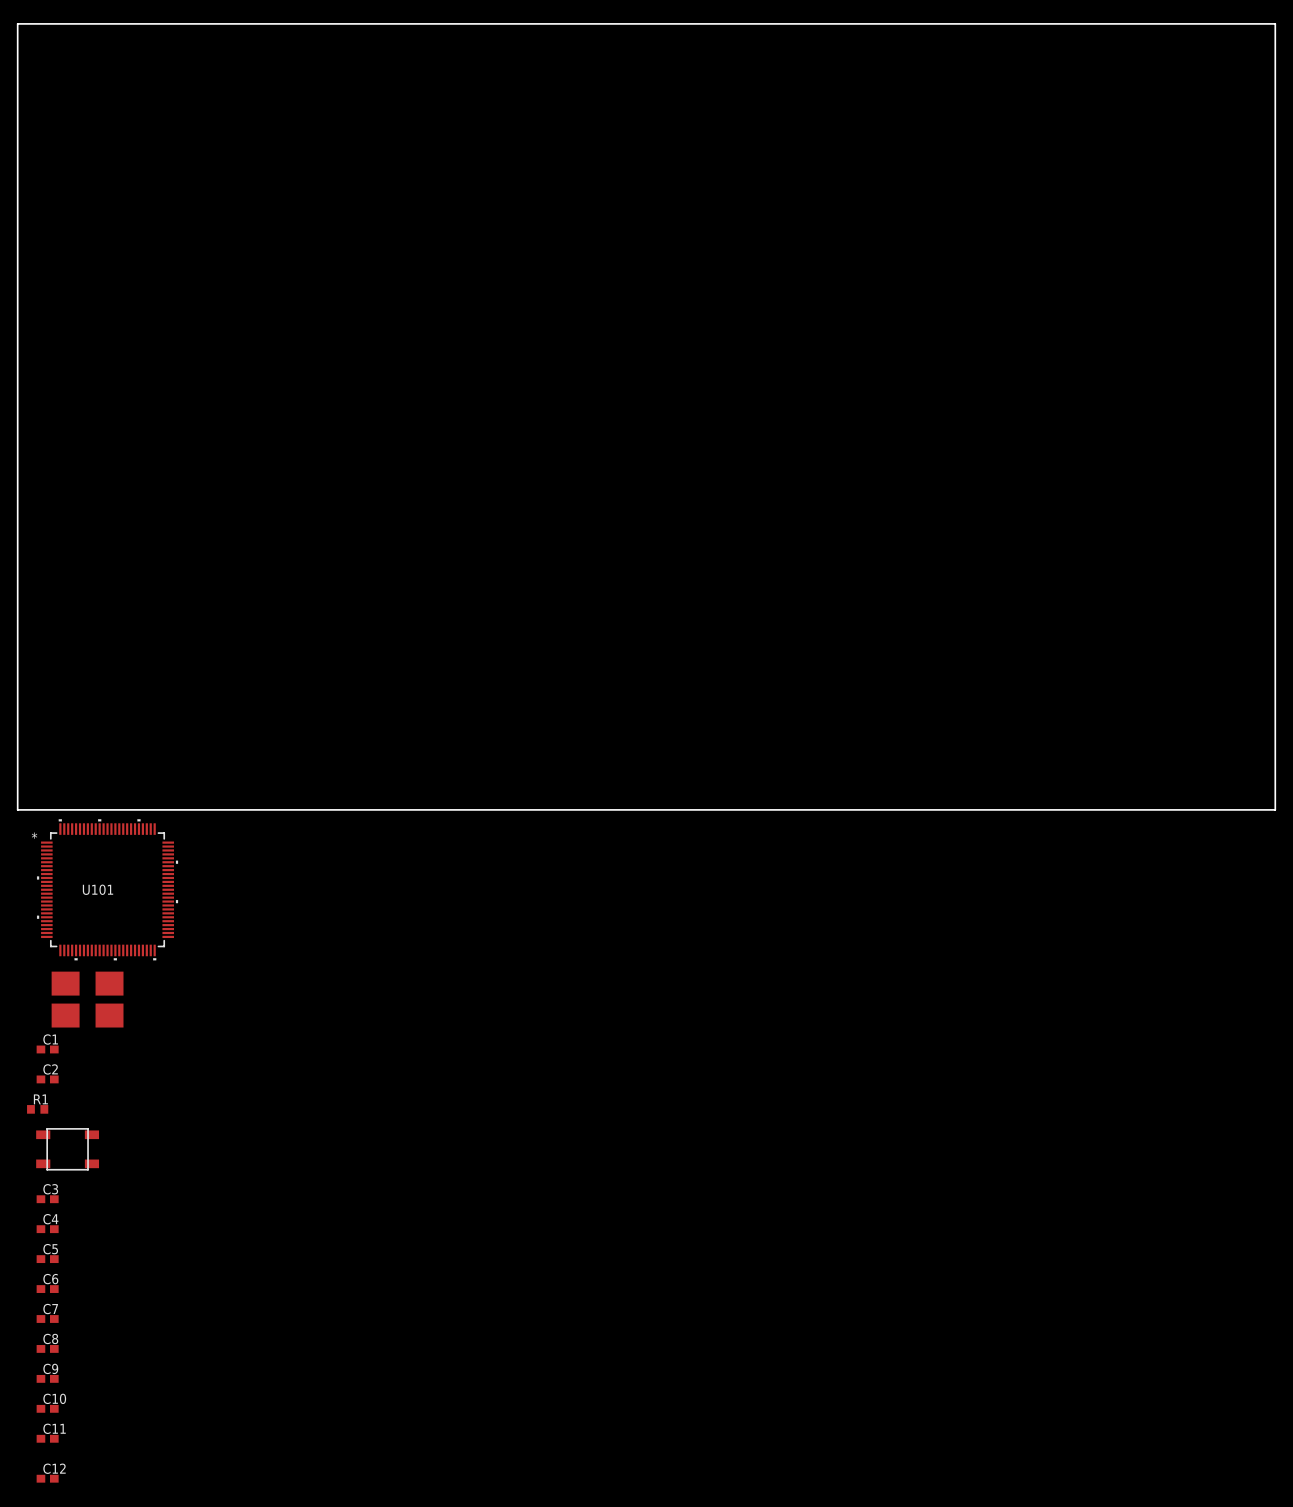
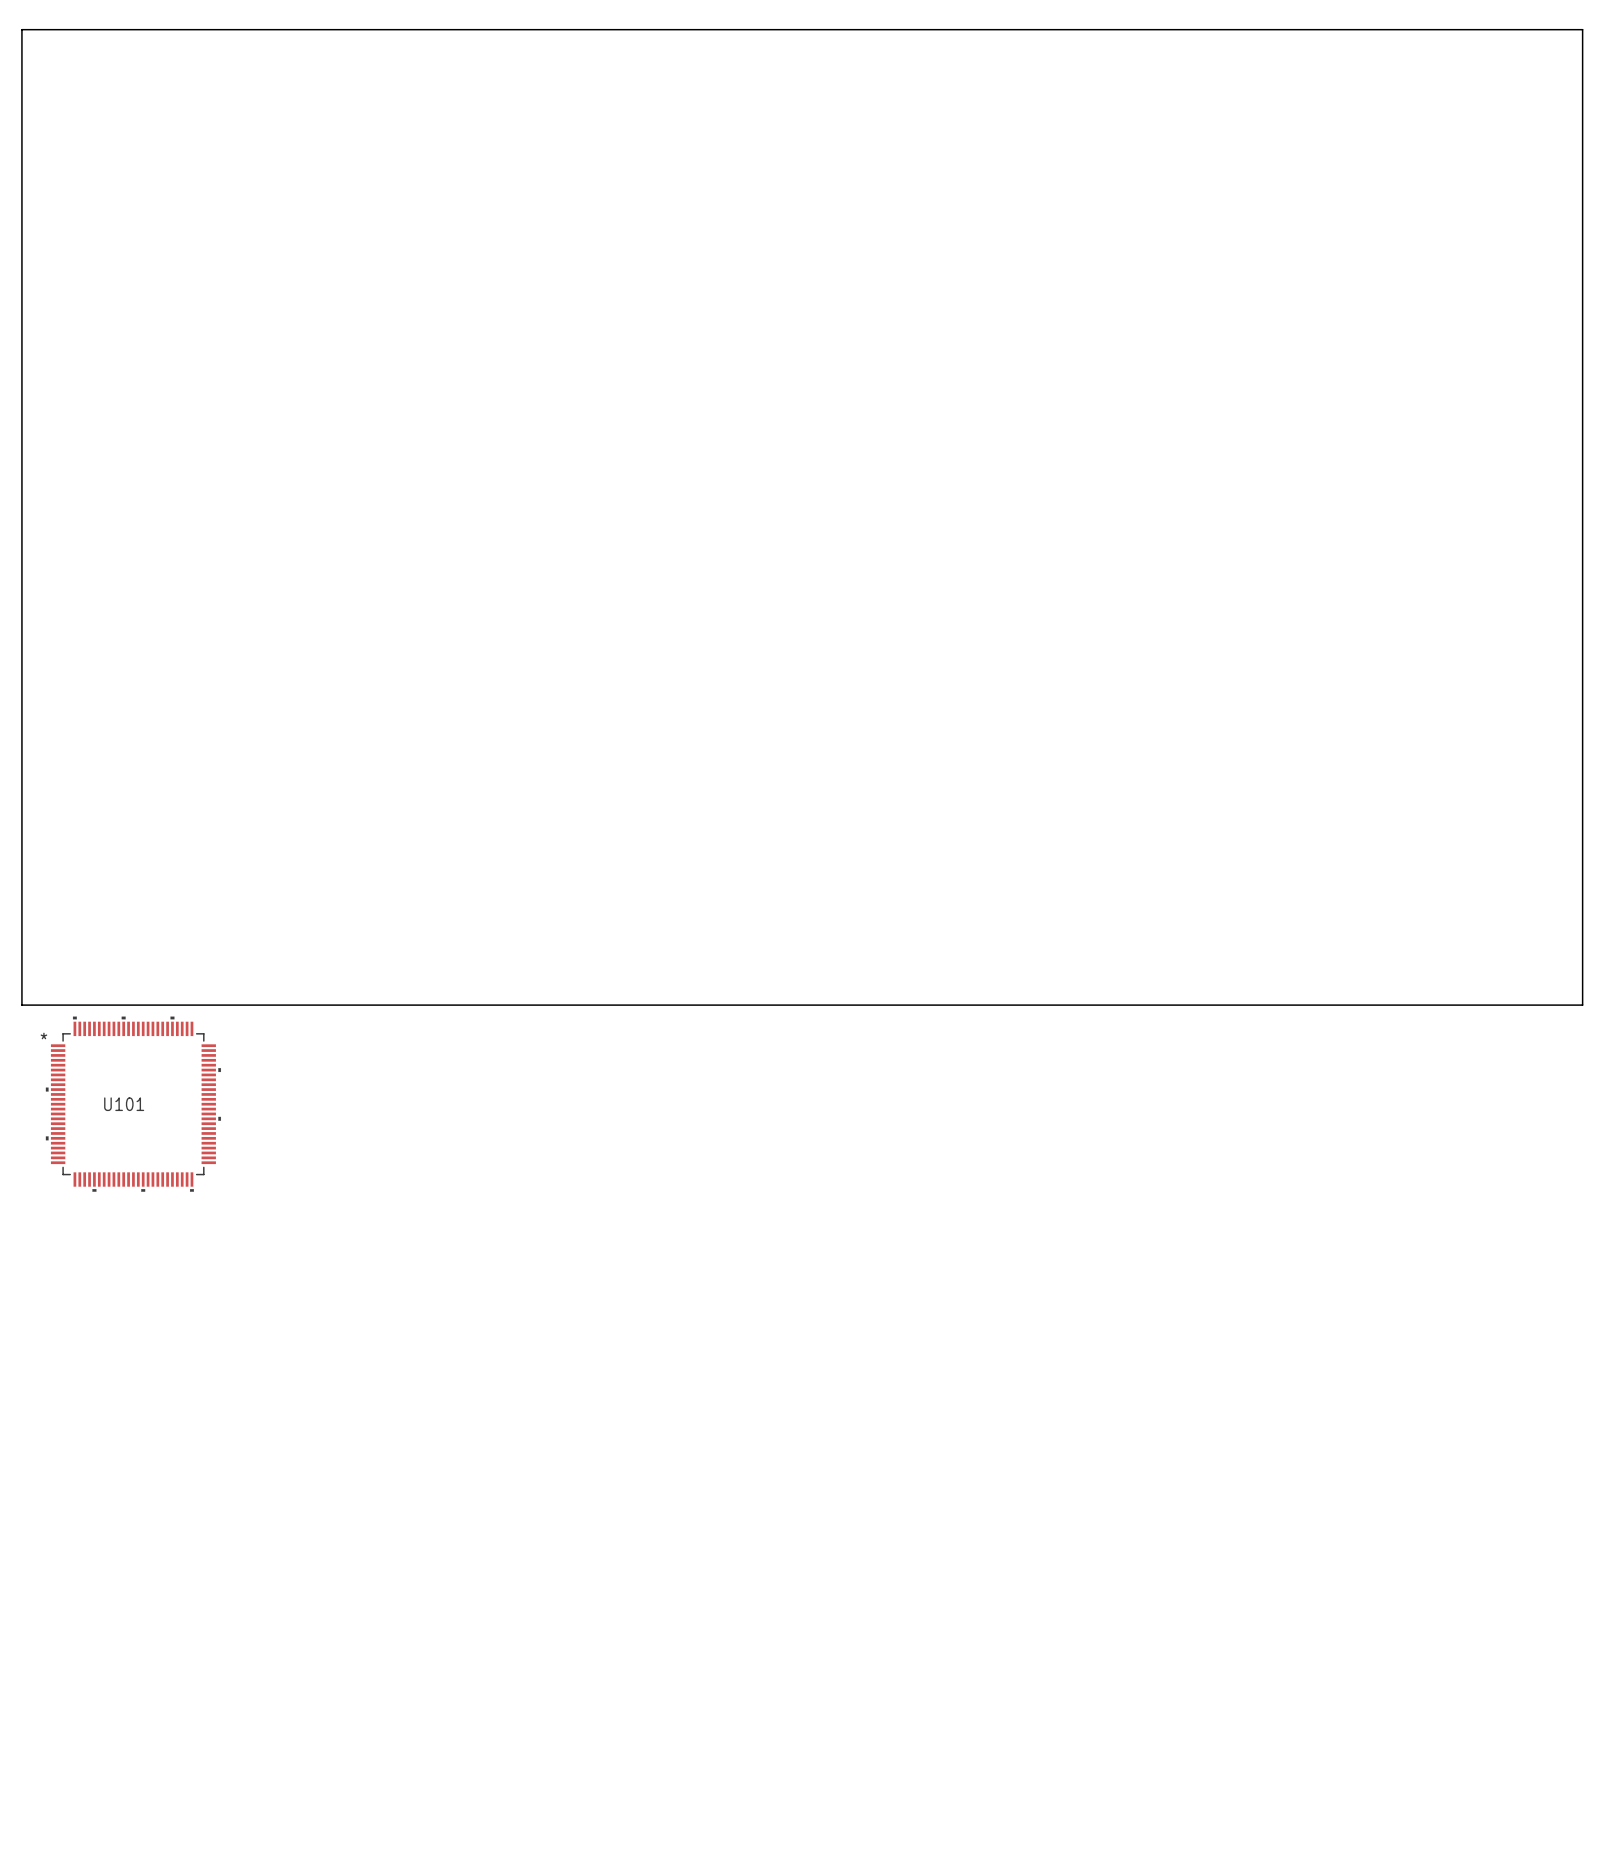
part: (87, 999) -> none
C1: (47, 1049) -> none
C2: (47, 1079) -> none
R1: (37, 1109) -> none
part: (67, 1149) -> none
C3: (47, 1199) -> none
C4: (47, 1229) -> none
C5: (47, 1259) -> none
C6: (47, 1289) -> none
C7: (47, 1319) -> none
C8: (47, 1348) -> none
C9: (47, 1378) -> none
C10: (47, 1408) -> none
C11: (47, 1438) -> none
C12: (47, 1478) -> none

